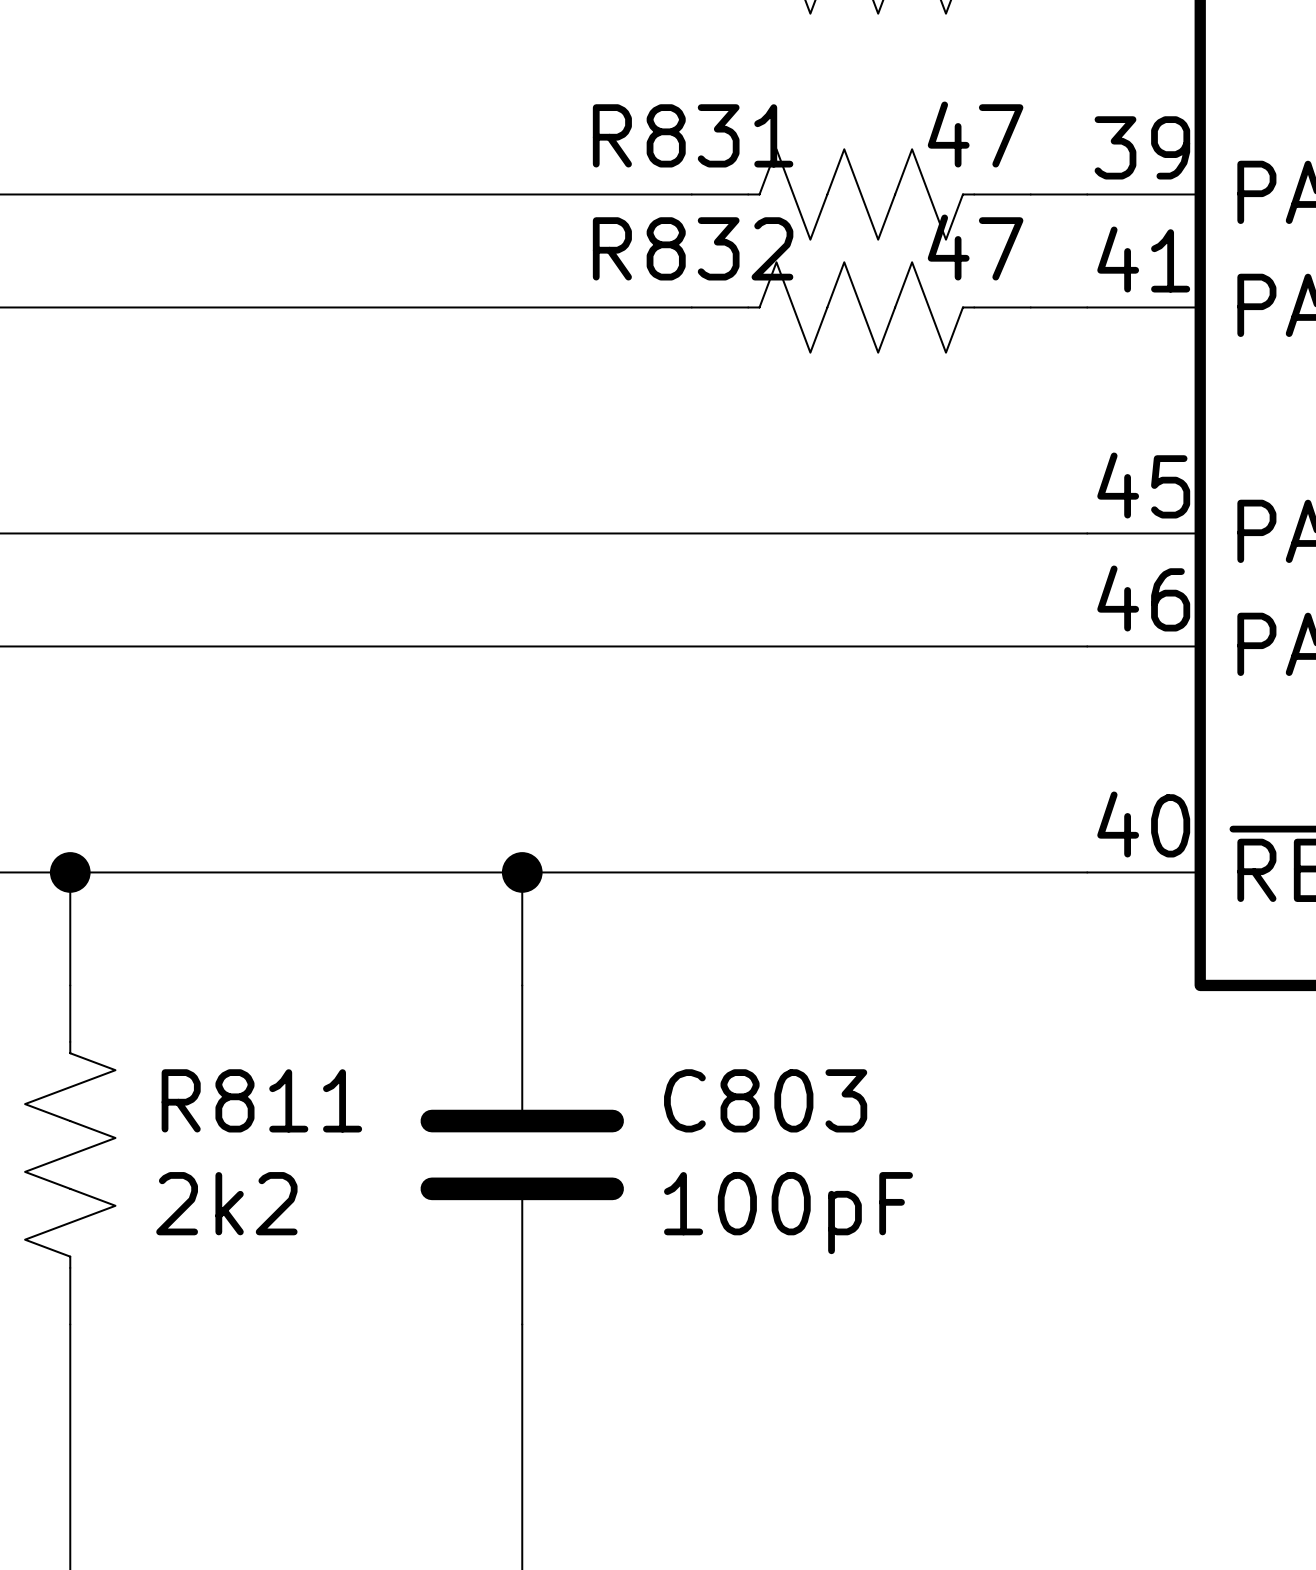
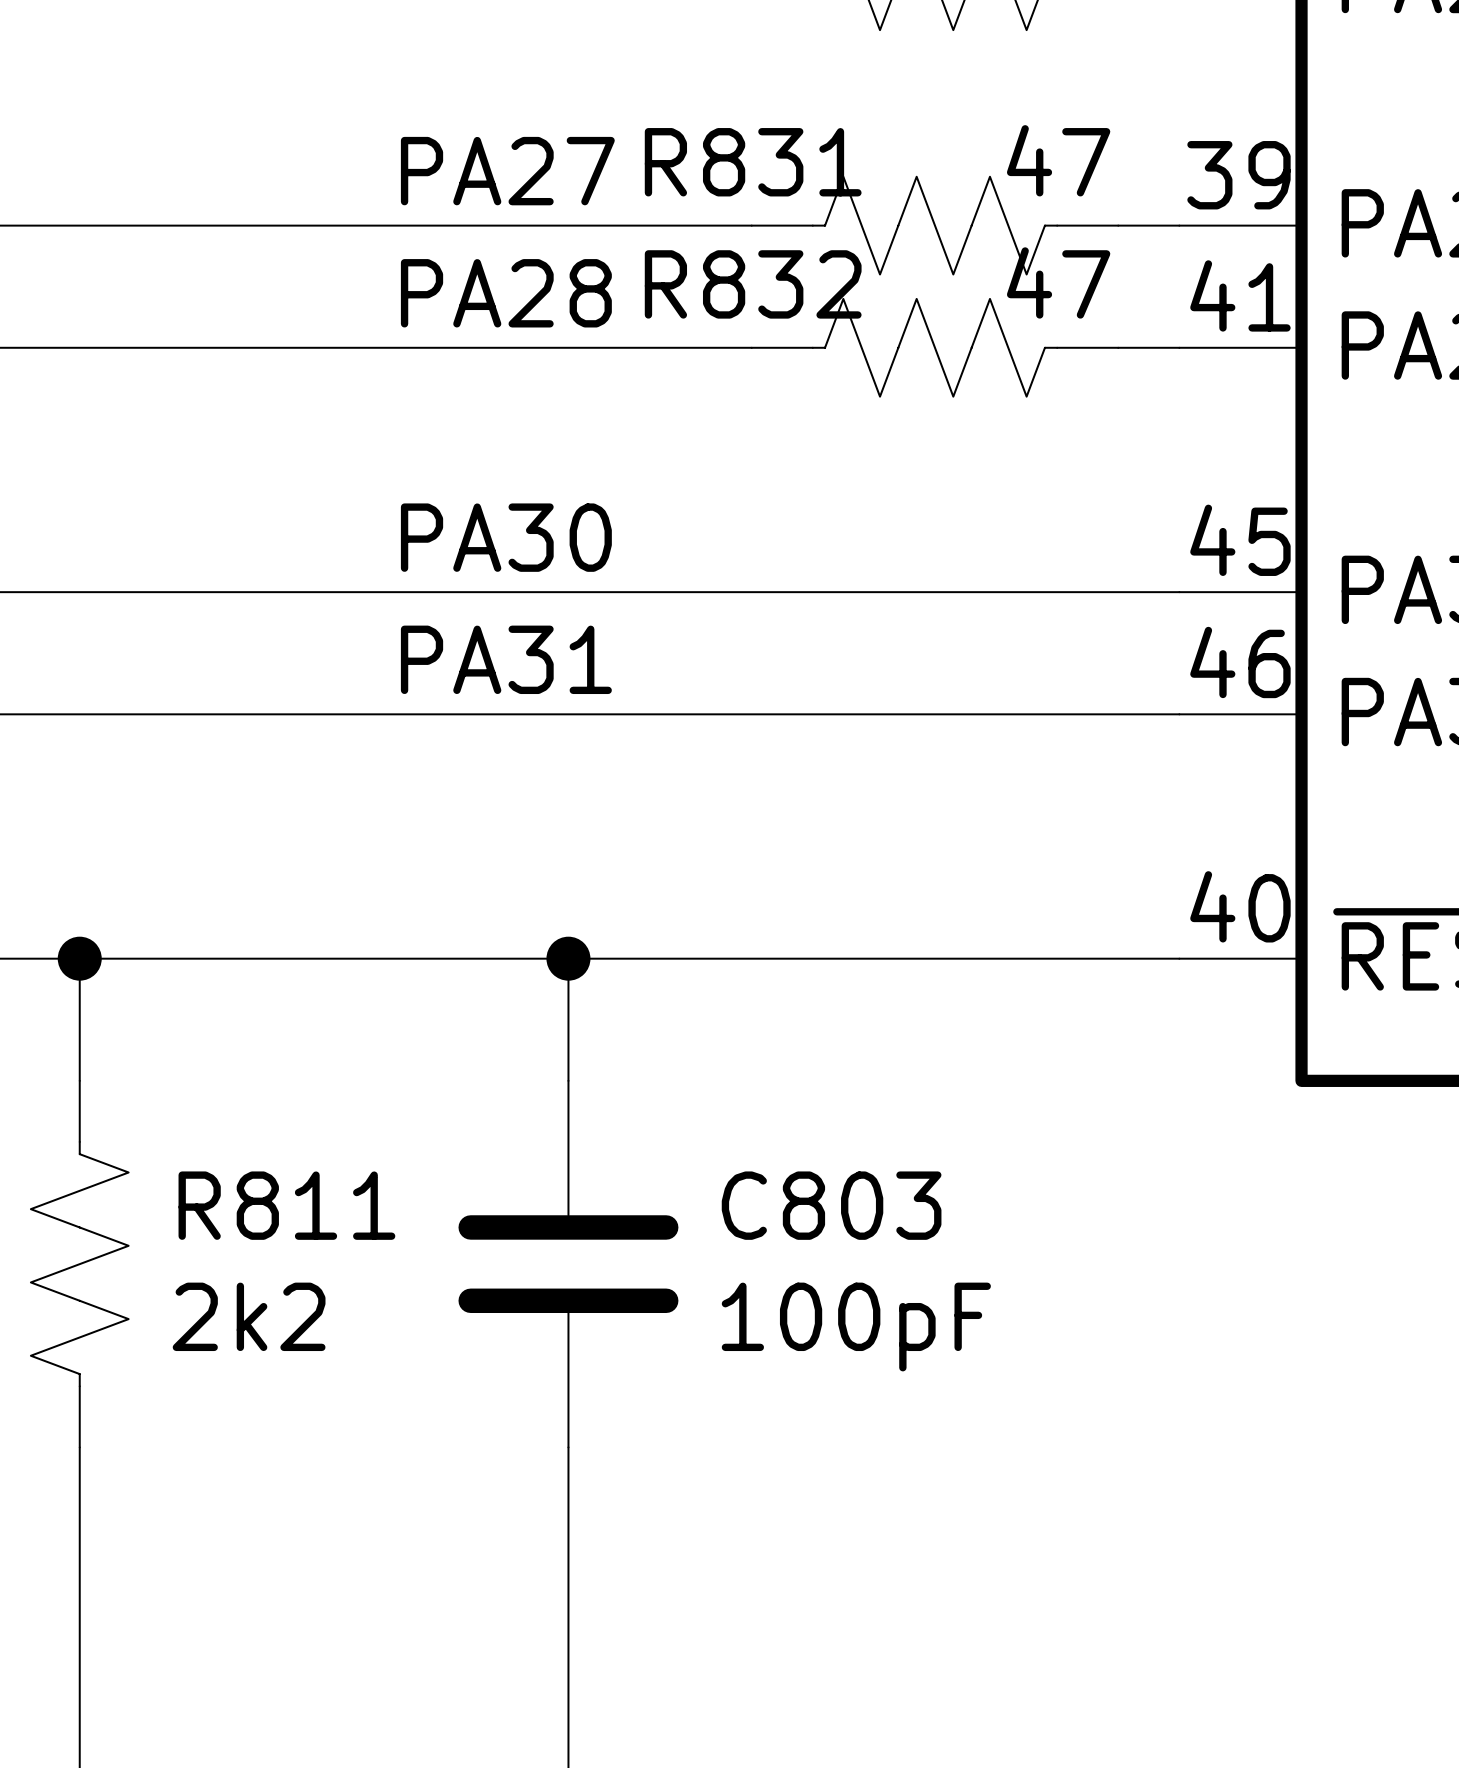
label: none -> PA27 (507, 171)
label: none -> PA28 (506, 293)
label: none -> PA30 (506, 537)
label: none -> PA31 (506, 659)

